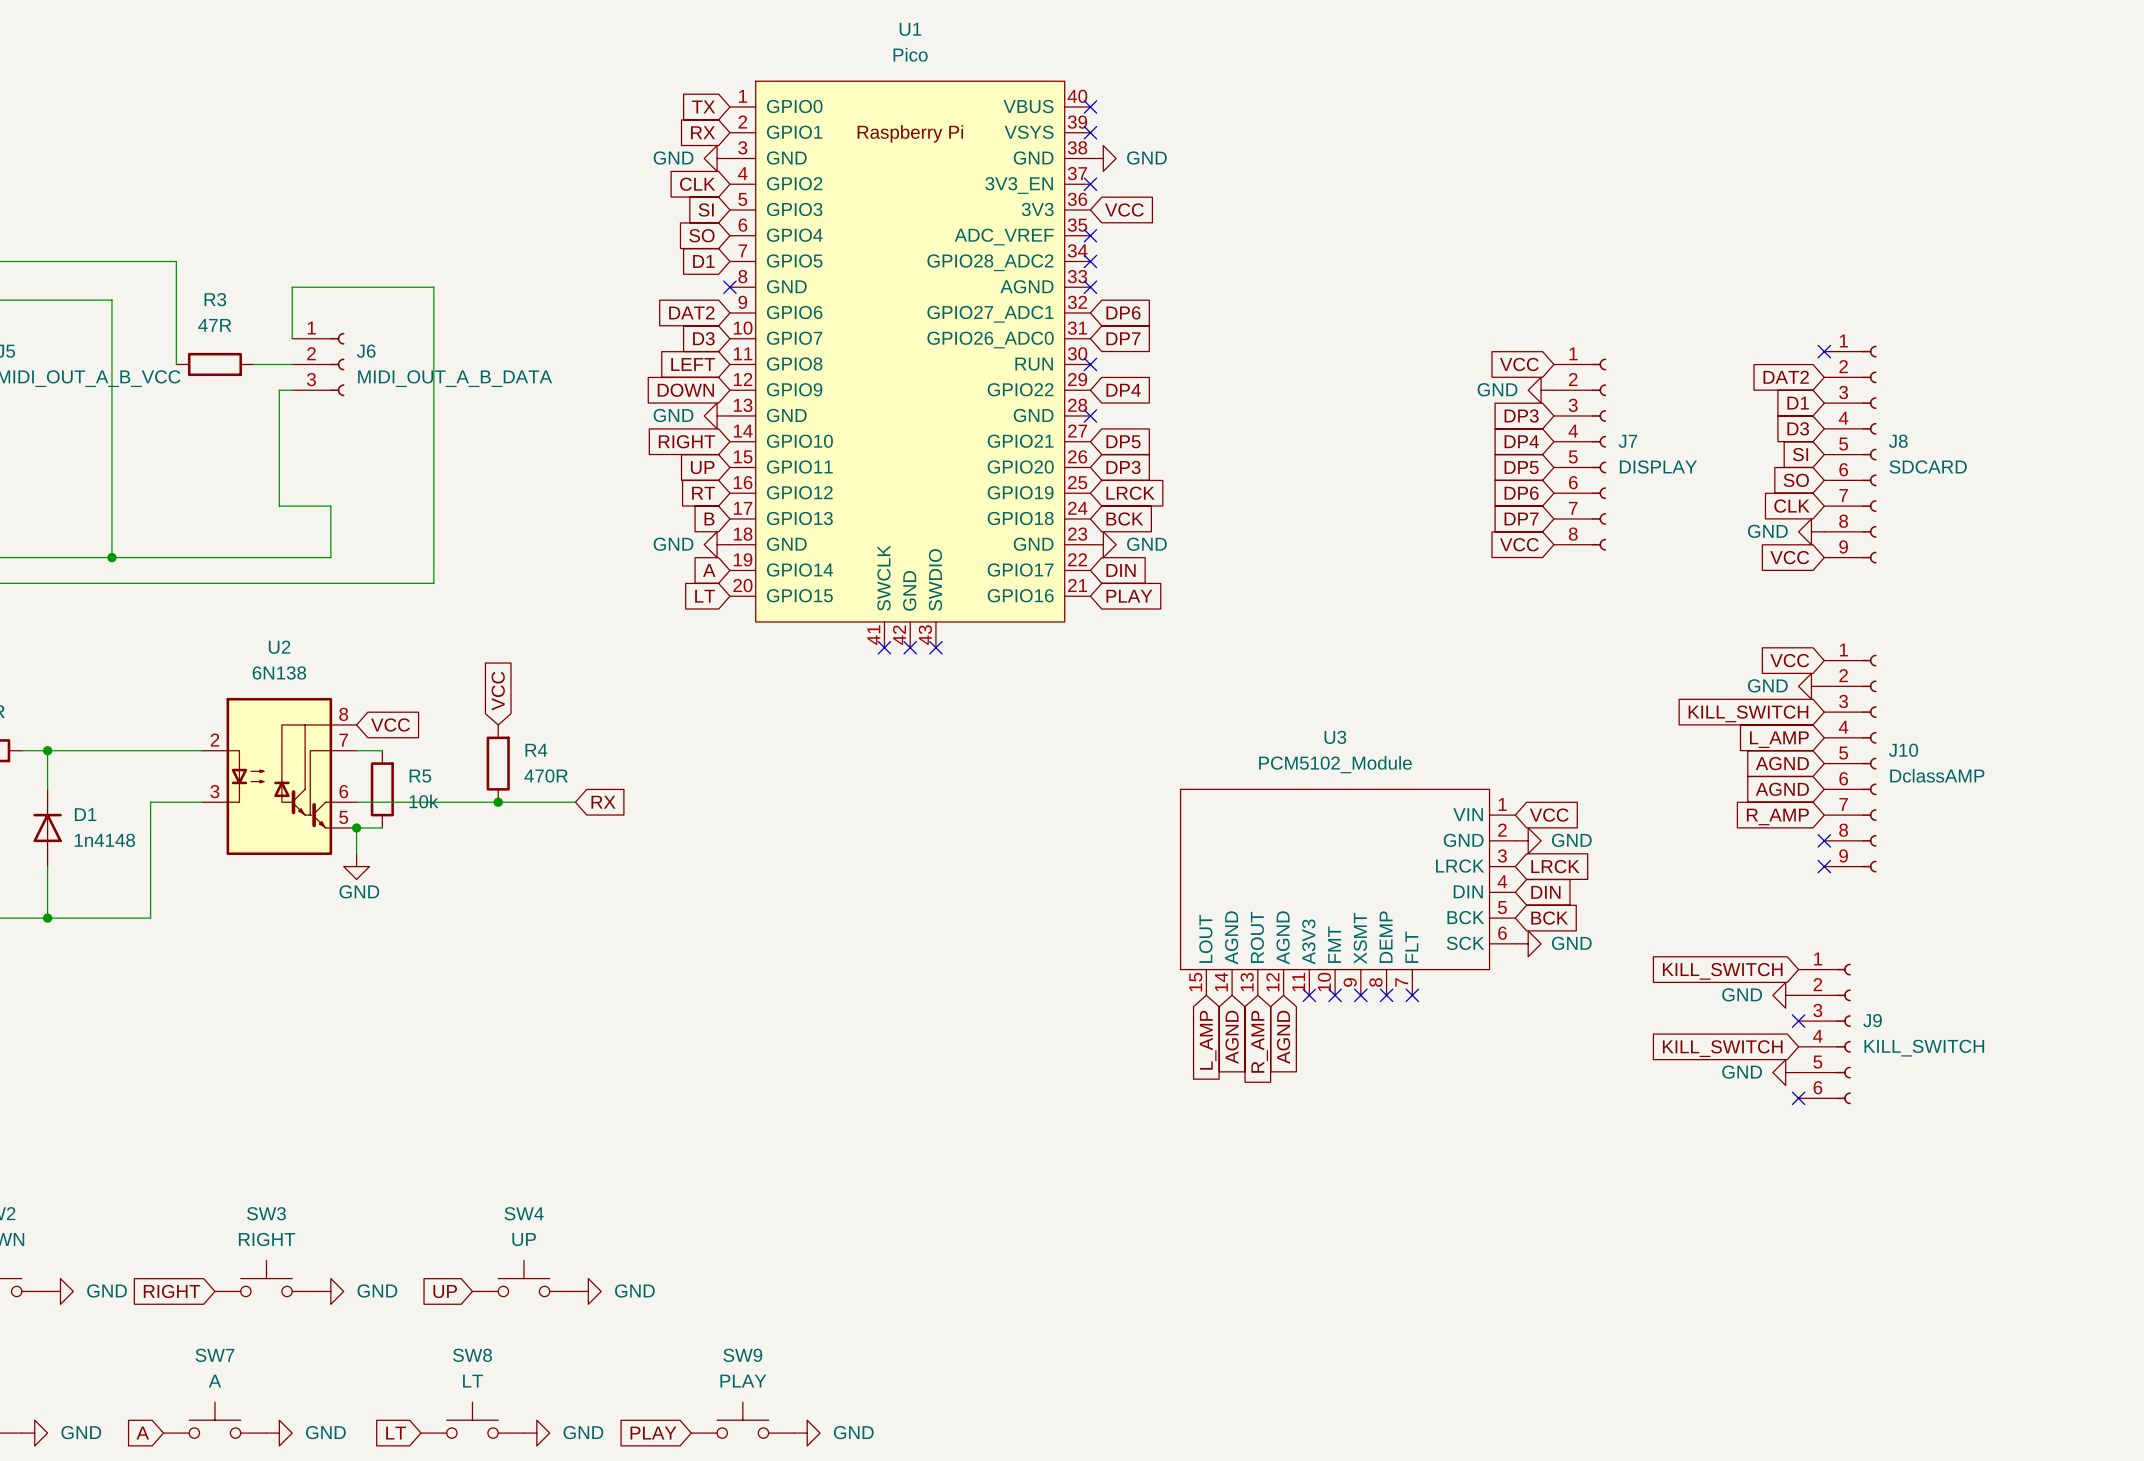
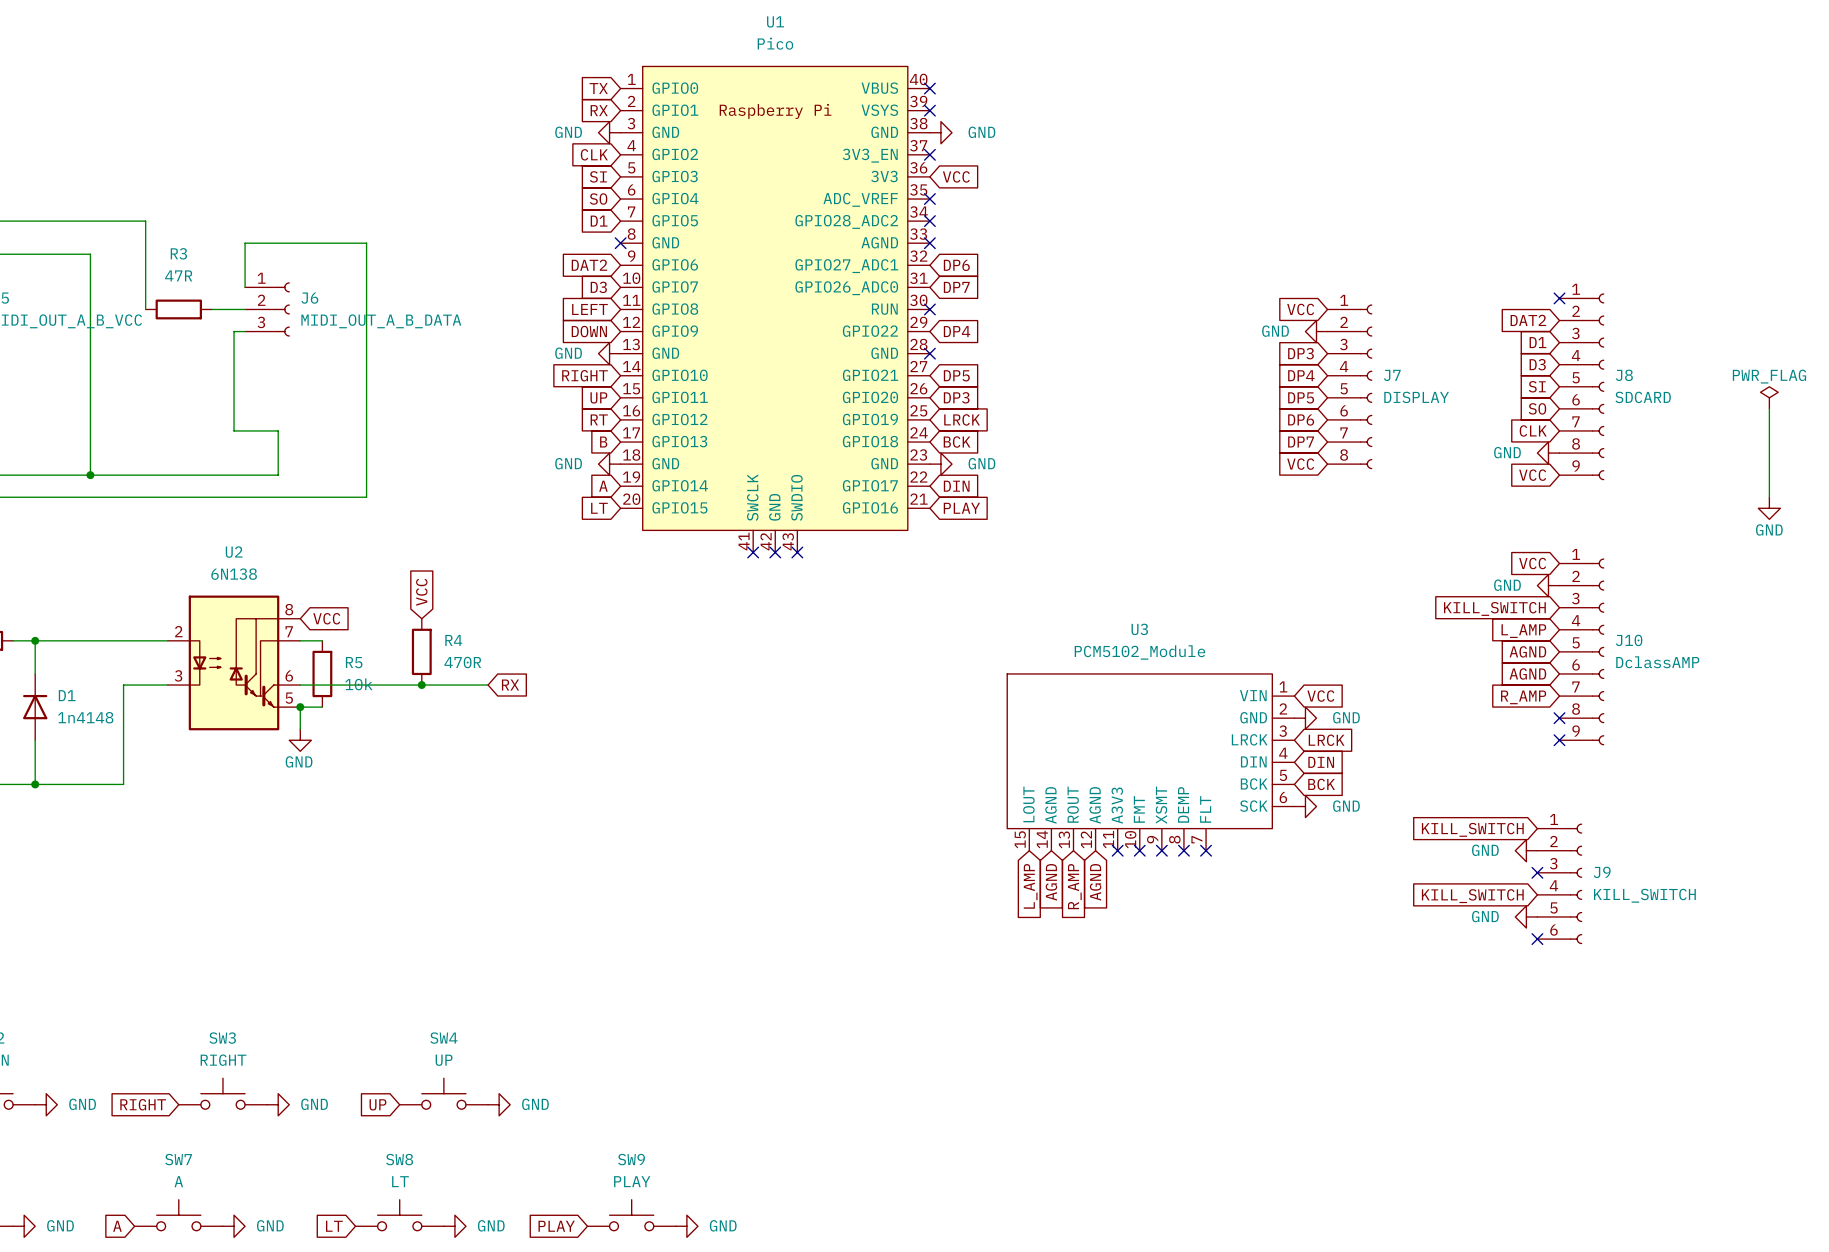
power symbol: none -> PWR_FLAG (1769, 397)
wire: none -> (1769, 408) (1769, 497)
power symbol: none -> GND (1769, 508)

